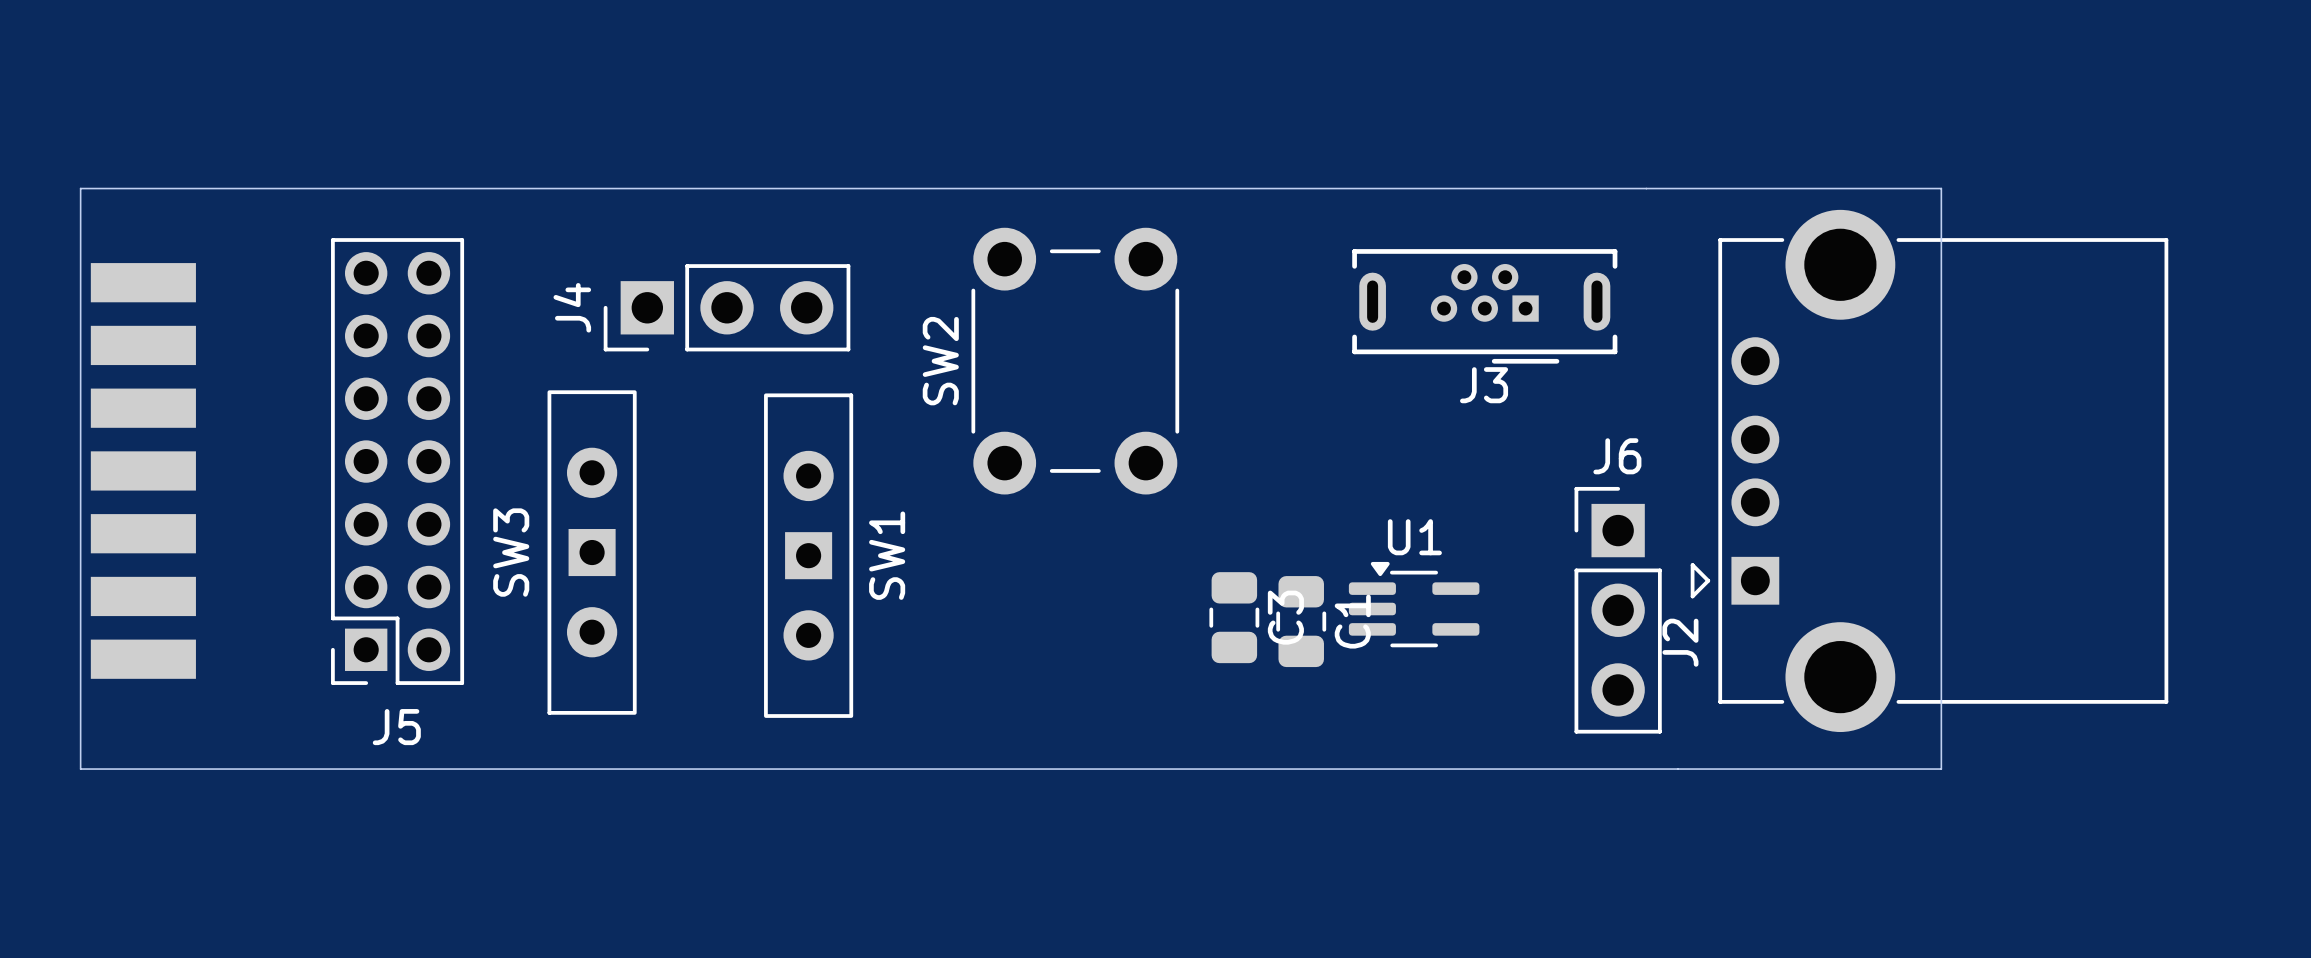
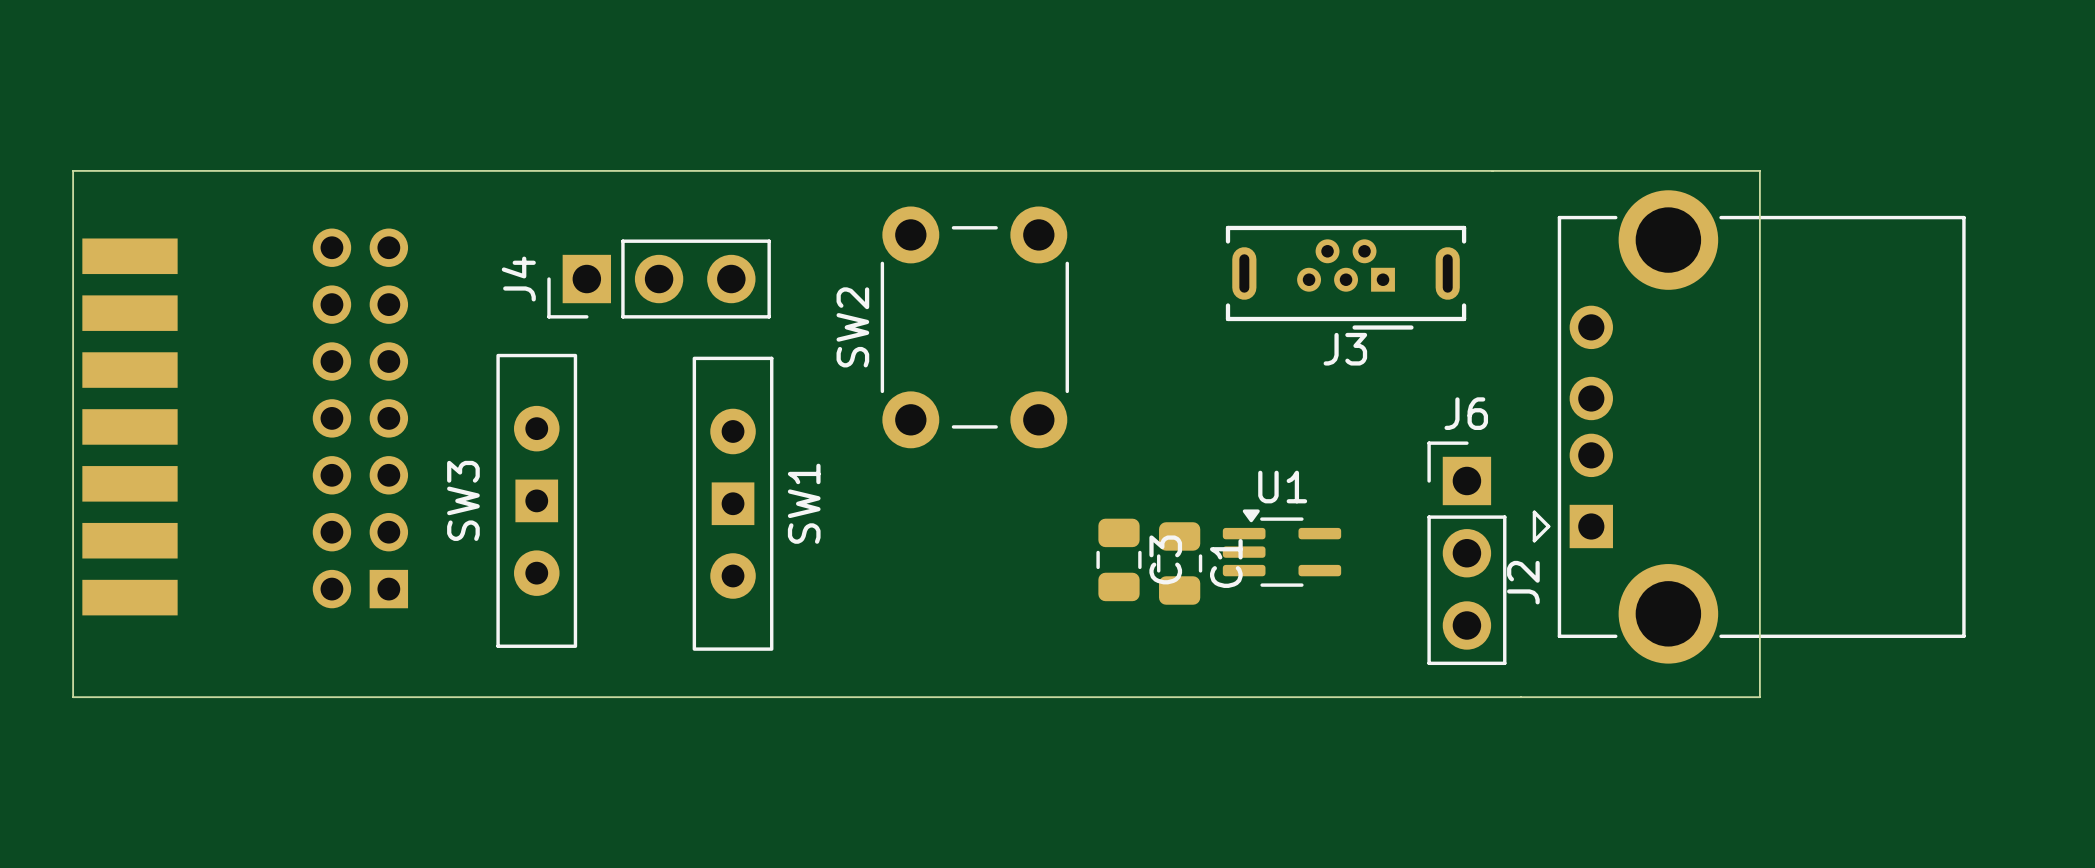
J5 side: top (397, 461) -> bottom (360, 418)

